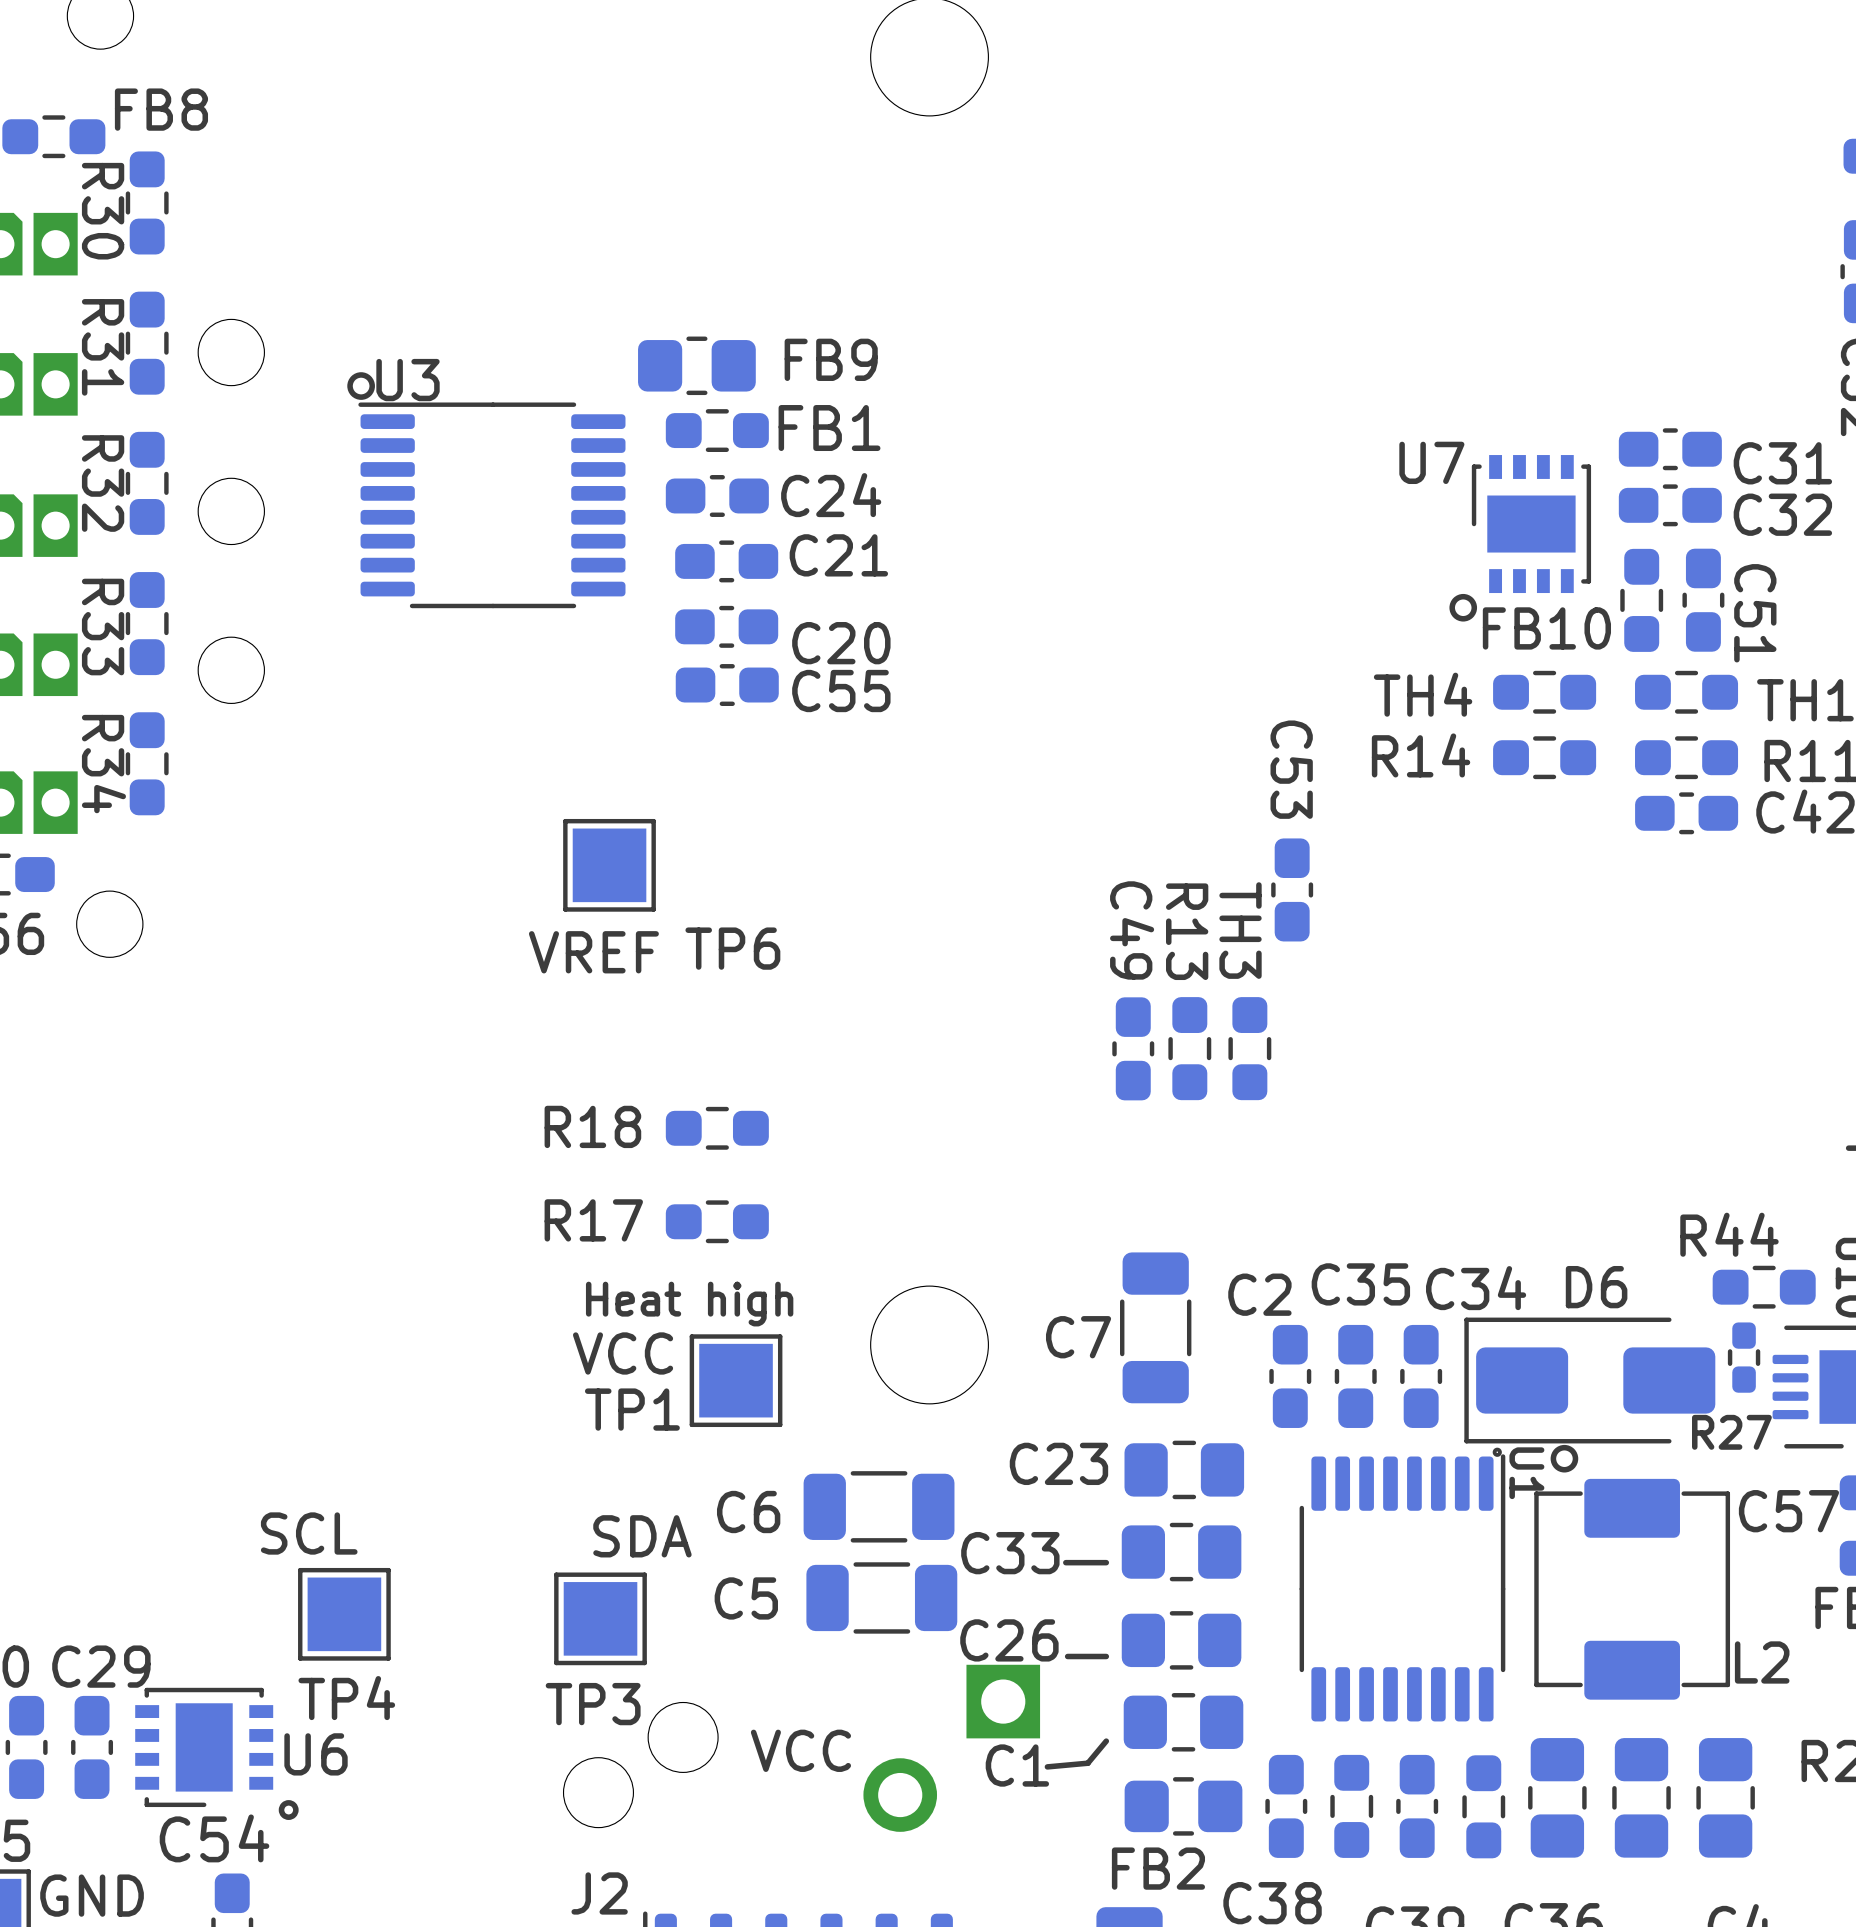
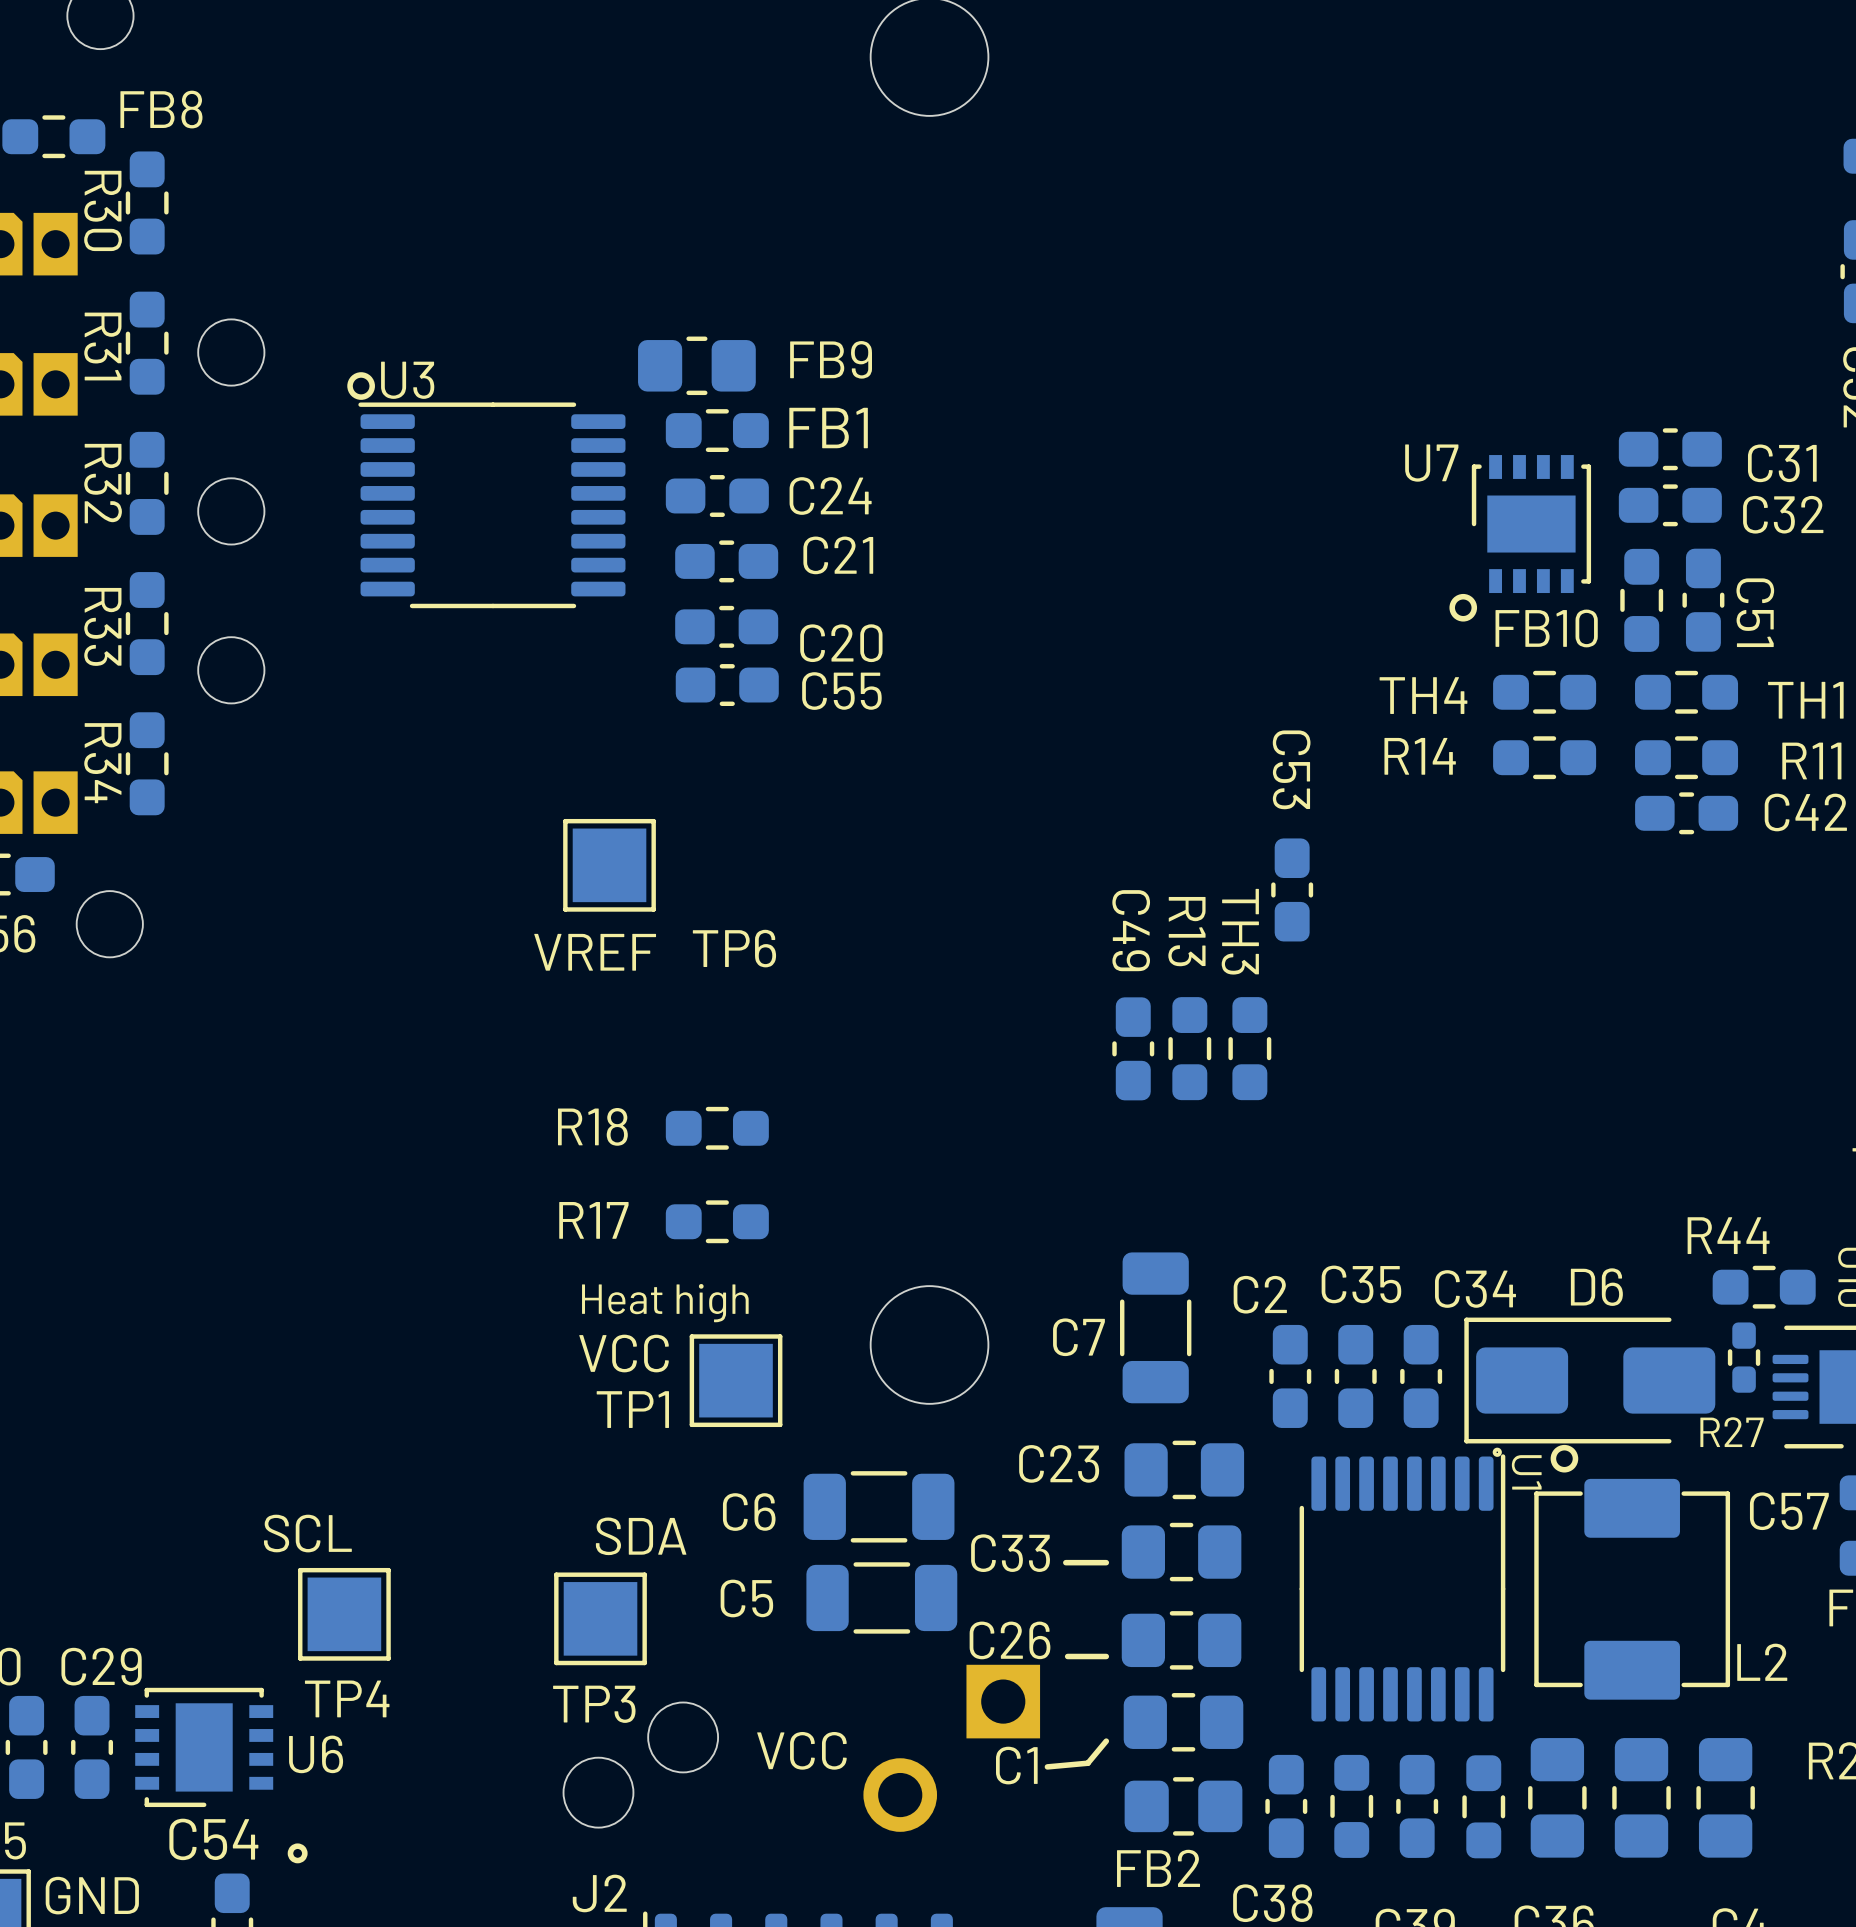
drawing position: (288, 1810) -> (297, 1853)

